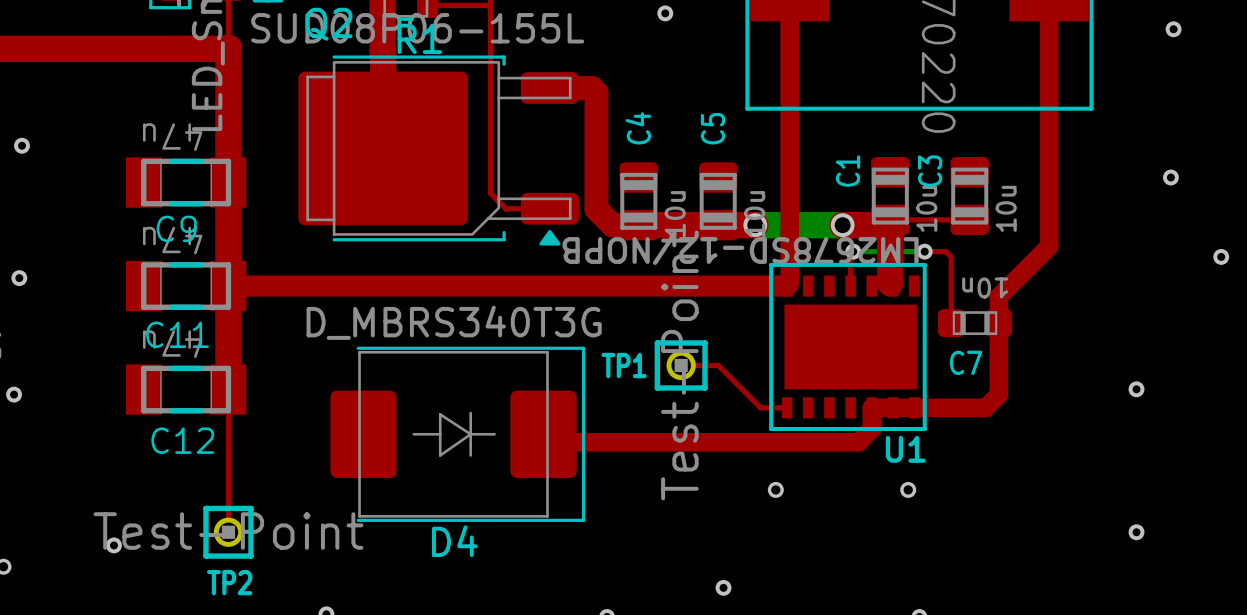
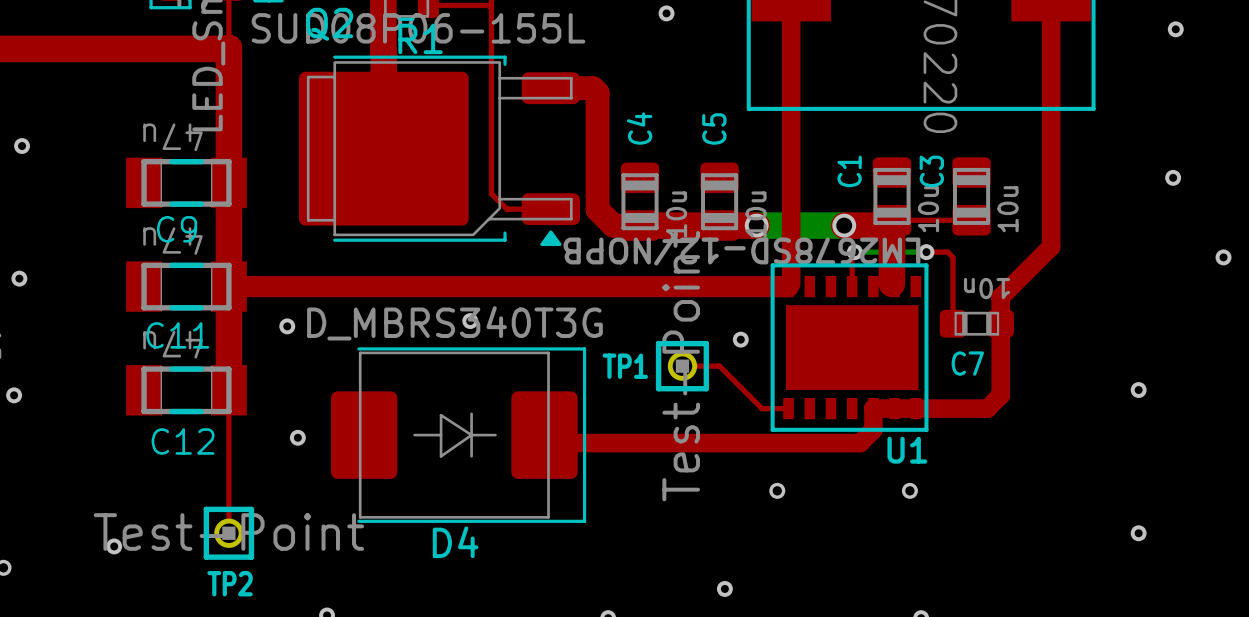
via: none -> (470, 321)
via: none -> (287, 326)
via: none -> (740, 339)
via: none -> (297, 437)

